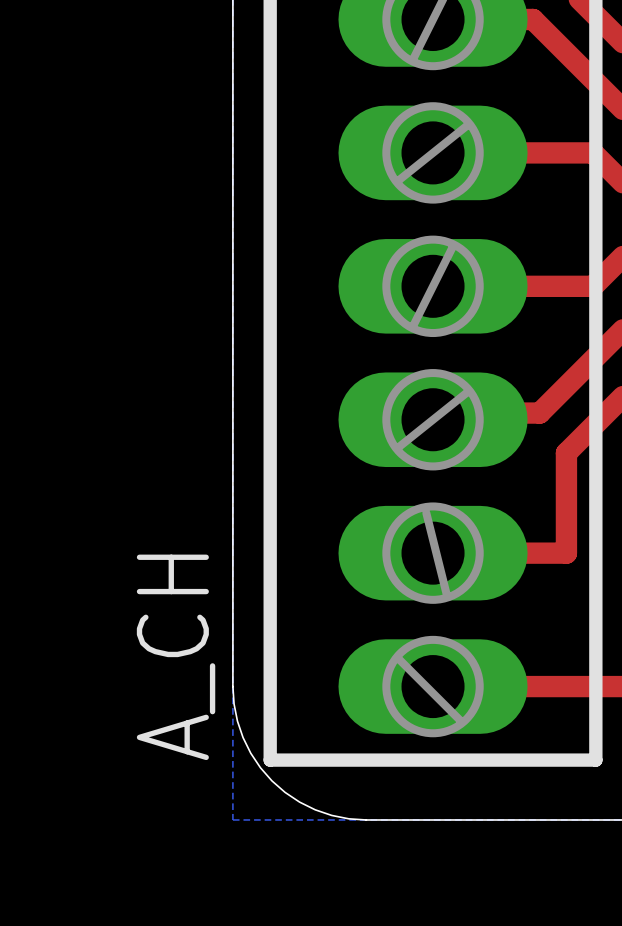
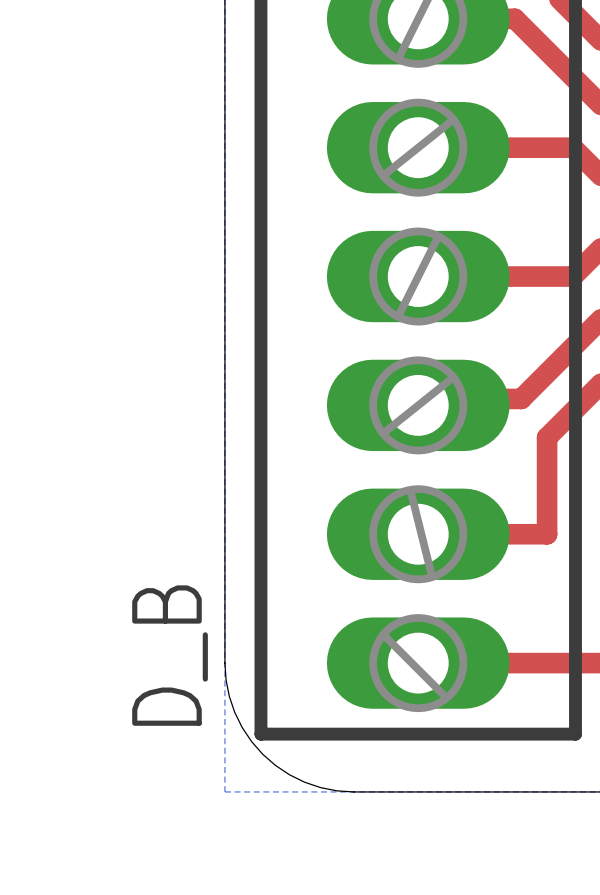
A_CH name: A_CH (176, 657) -> D_B (170, 655)

